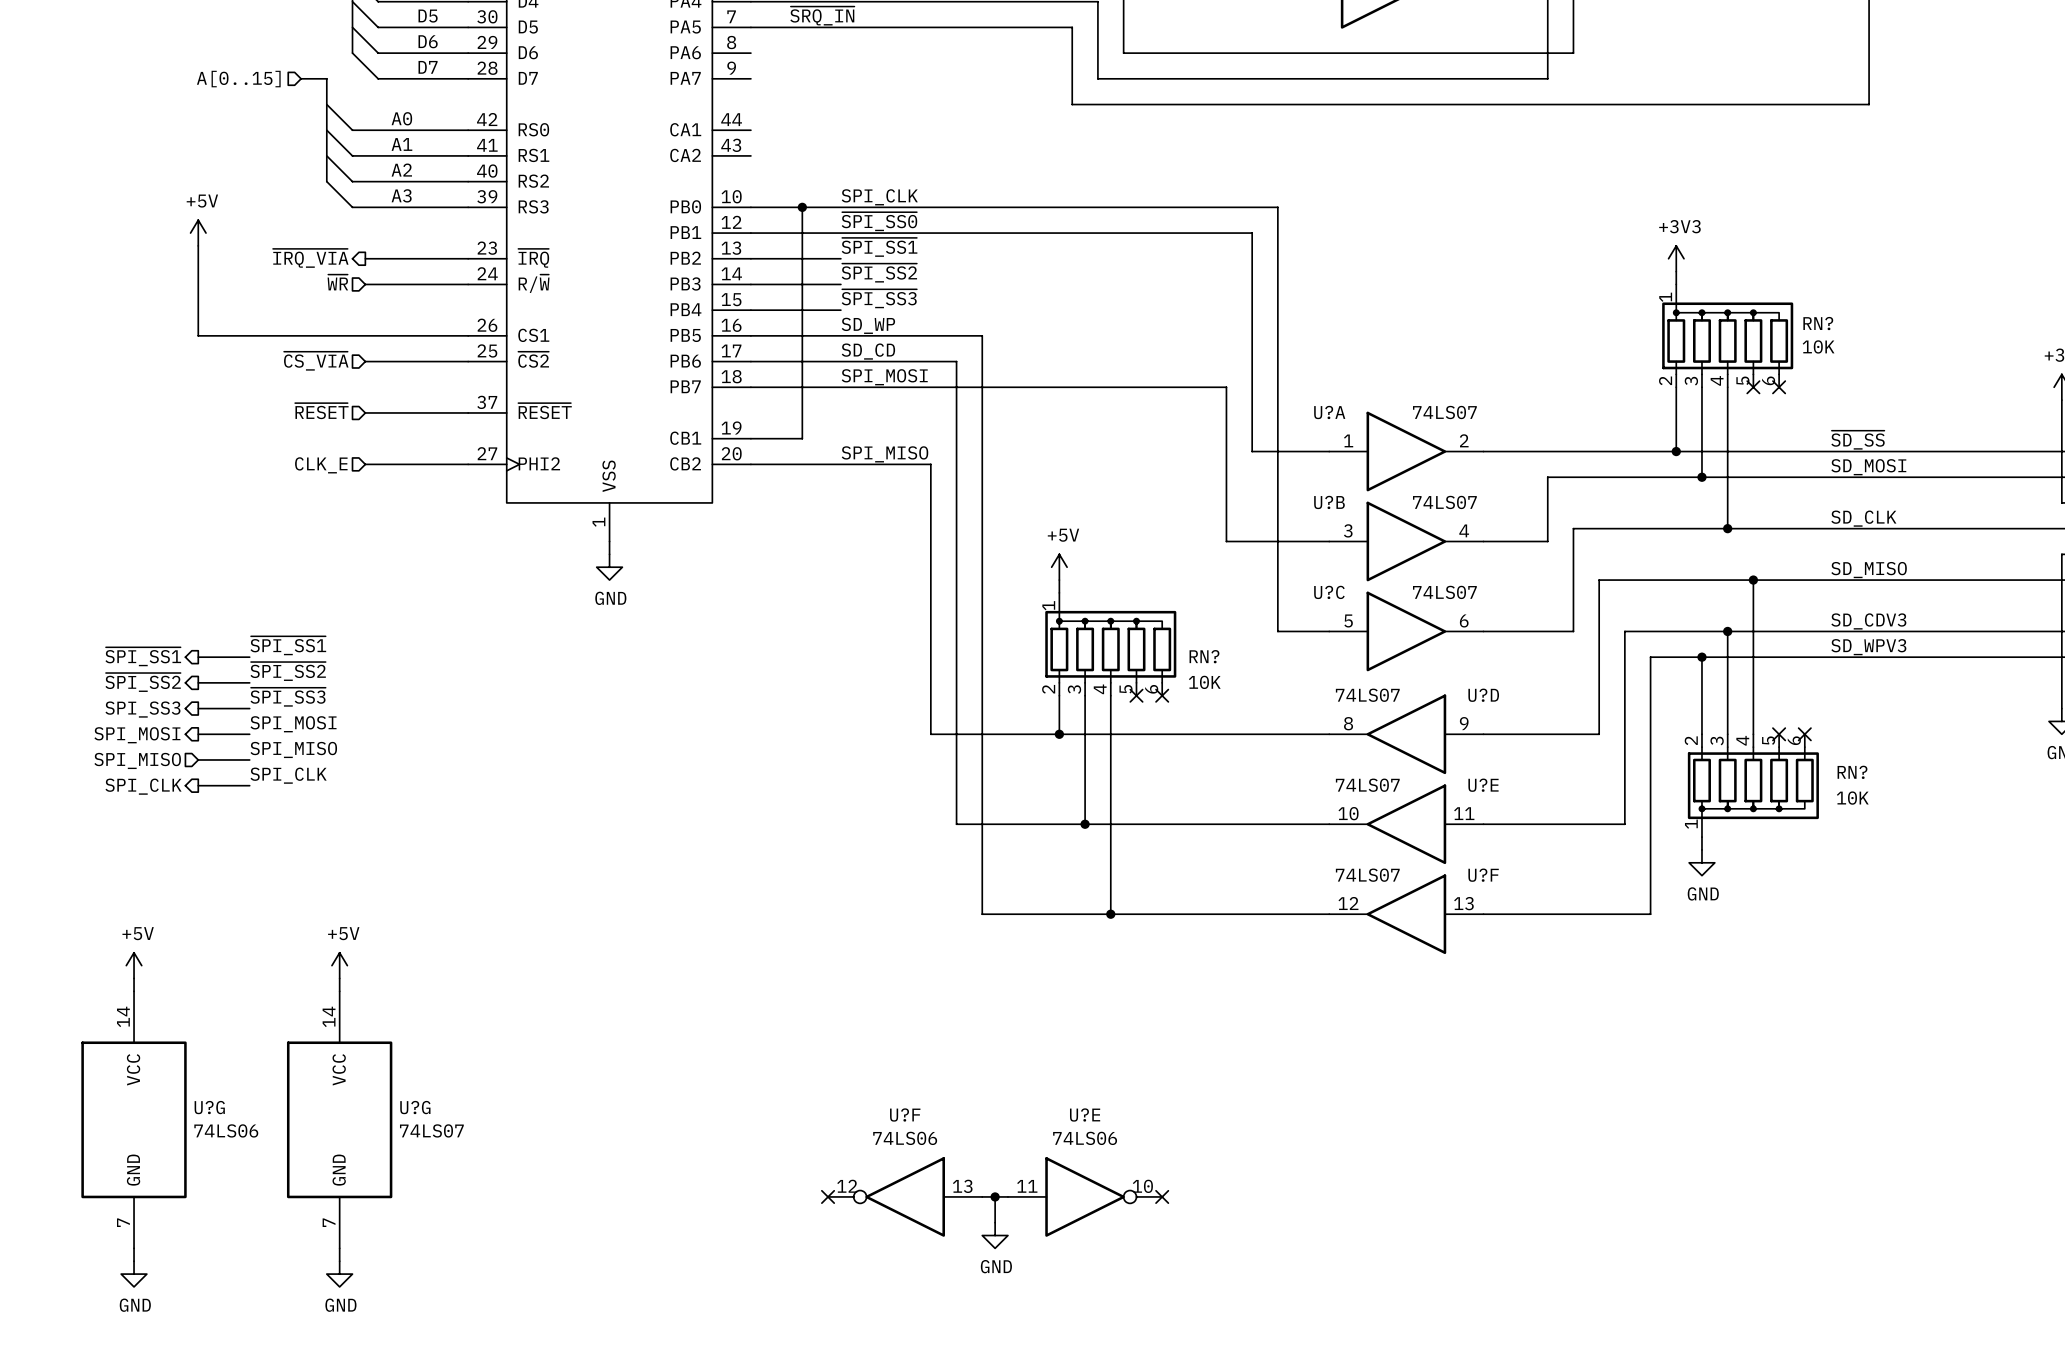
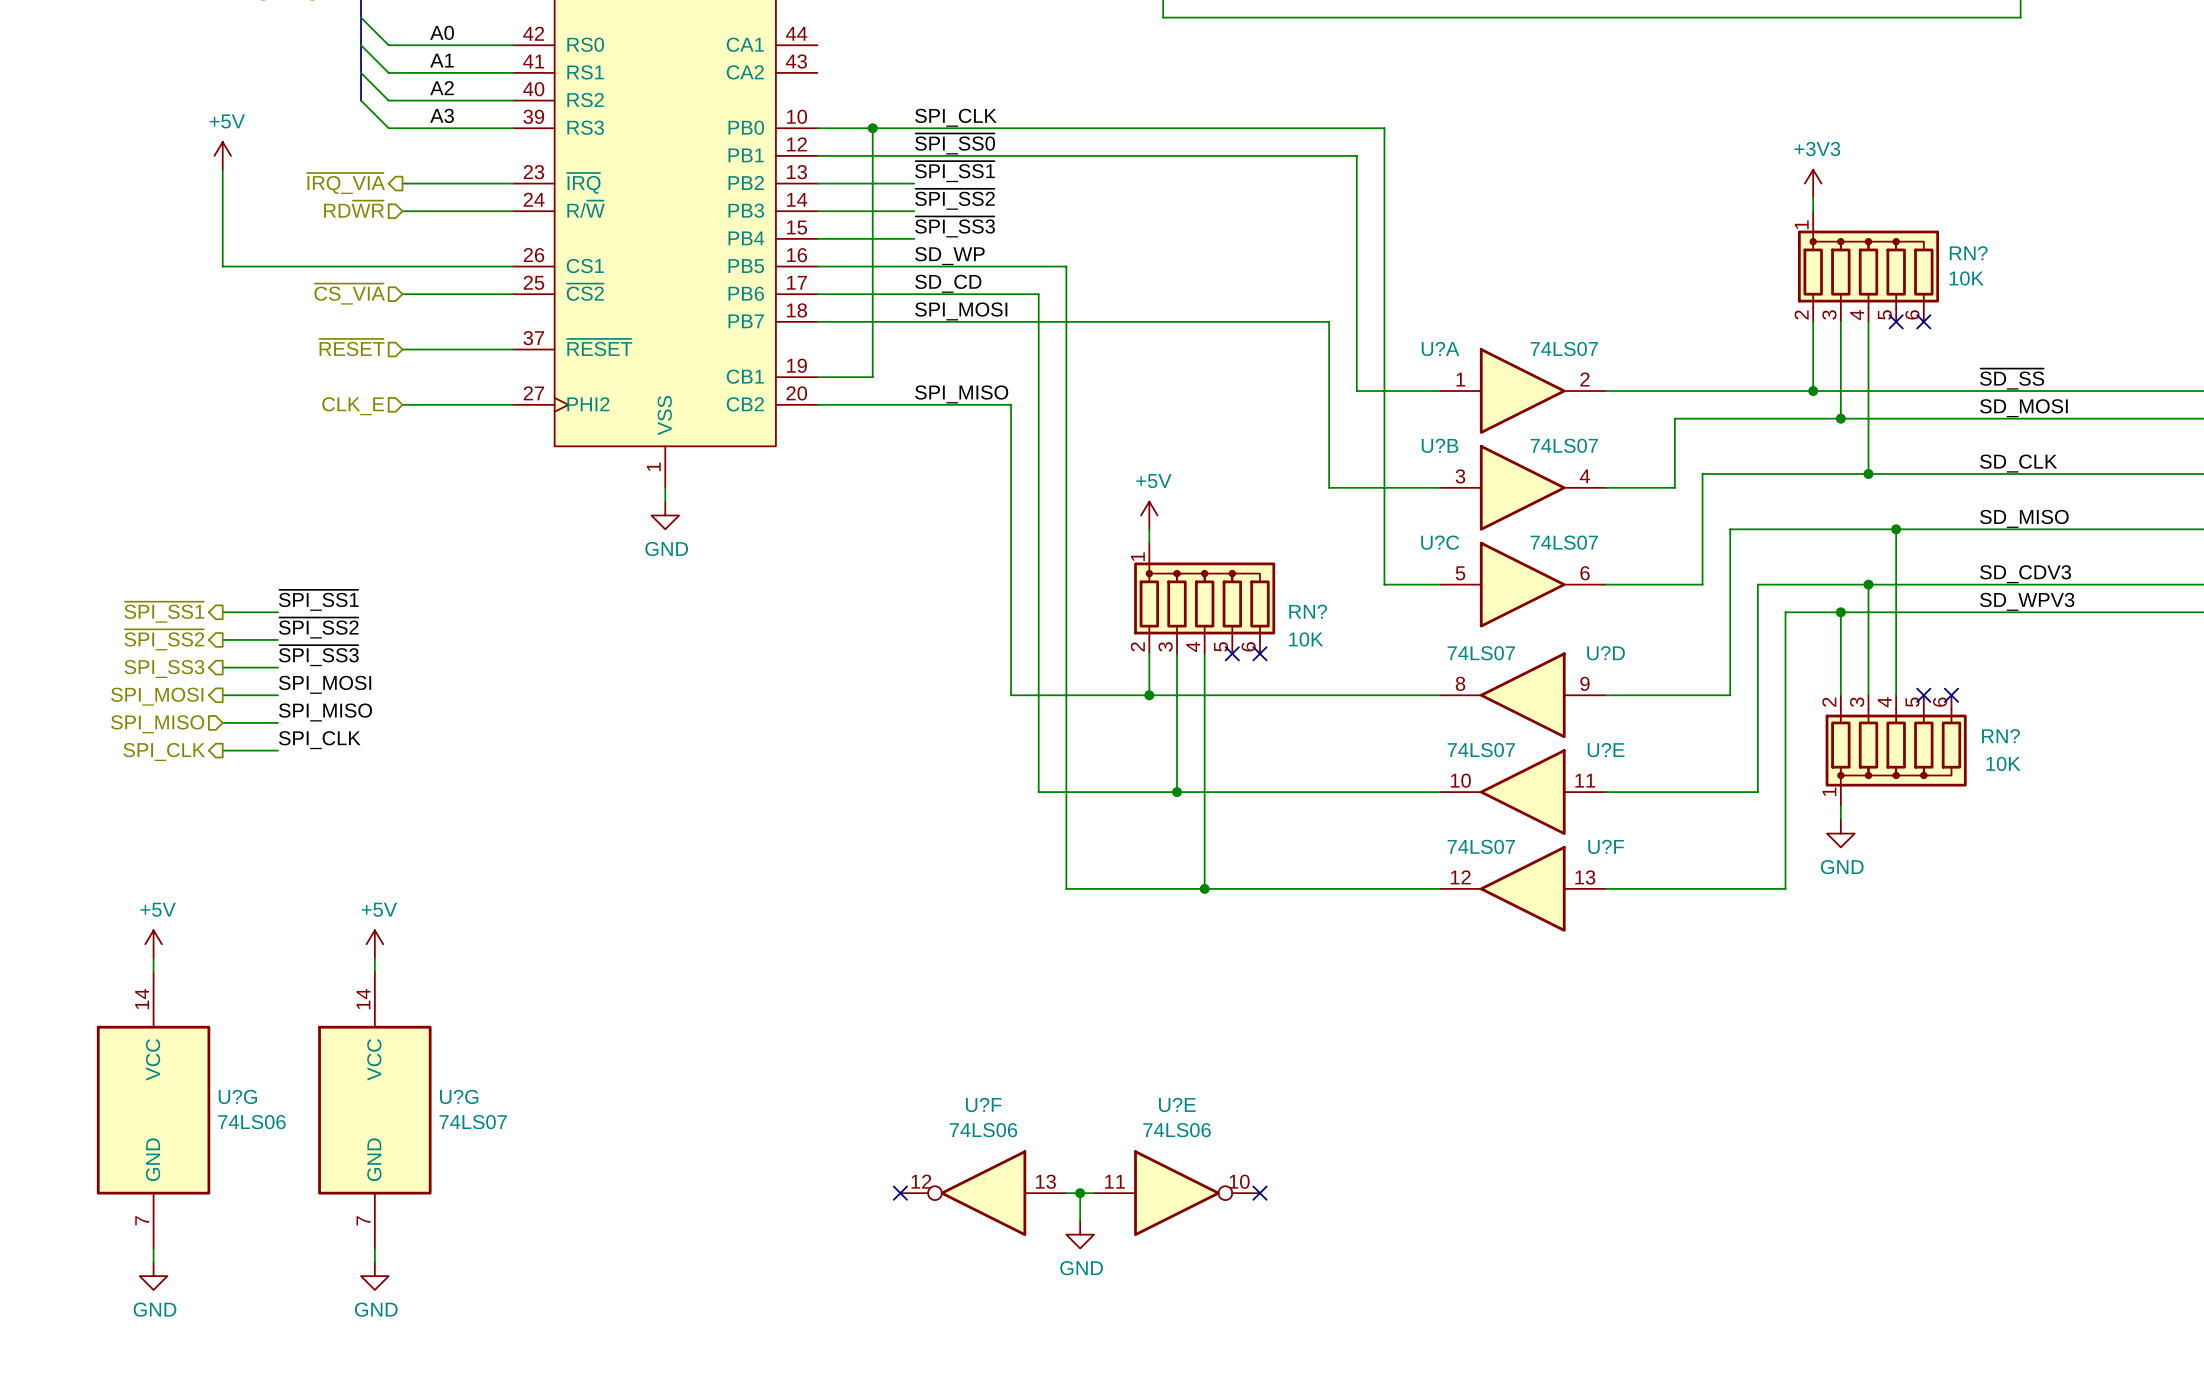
hierarchical label: ~{WR} (337, 282) -> RD~{WR} (354, 209)

